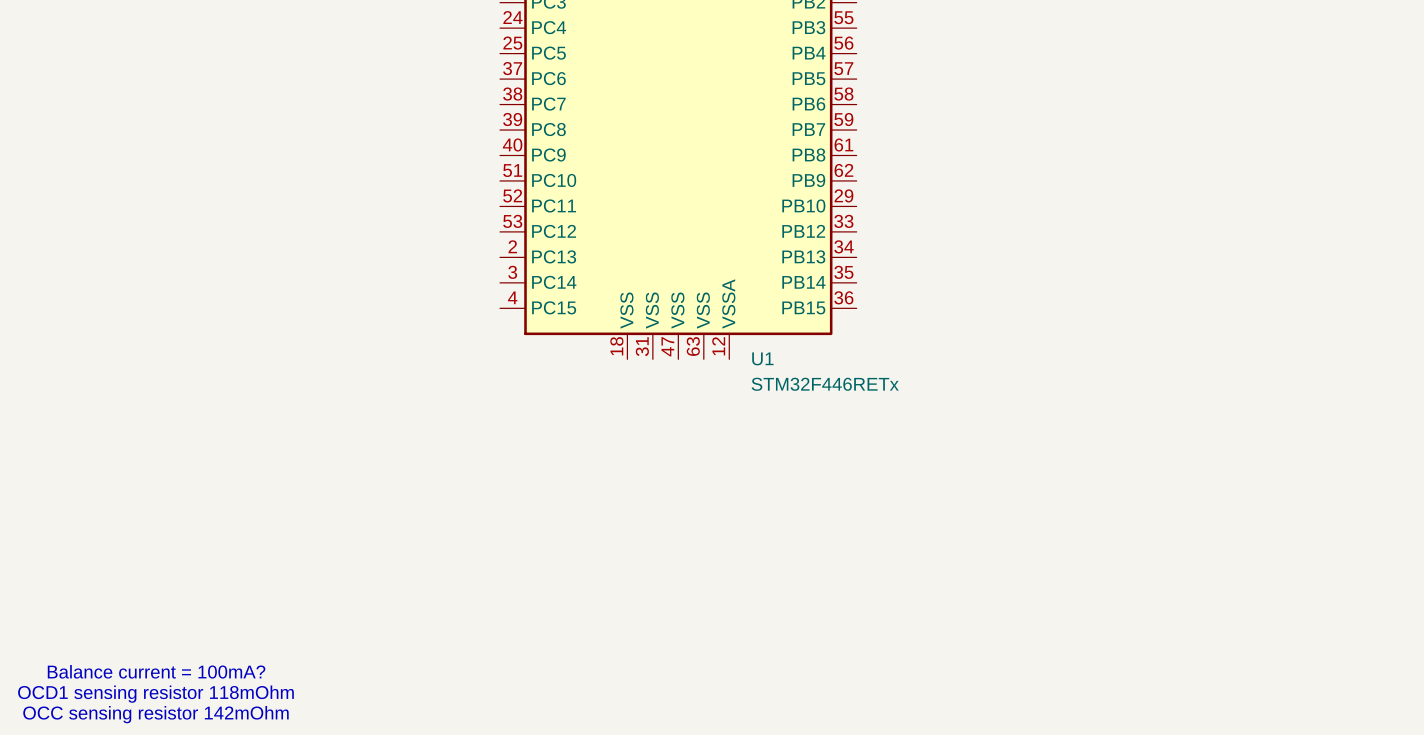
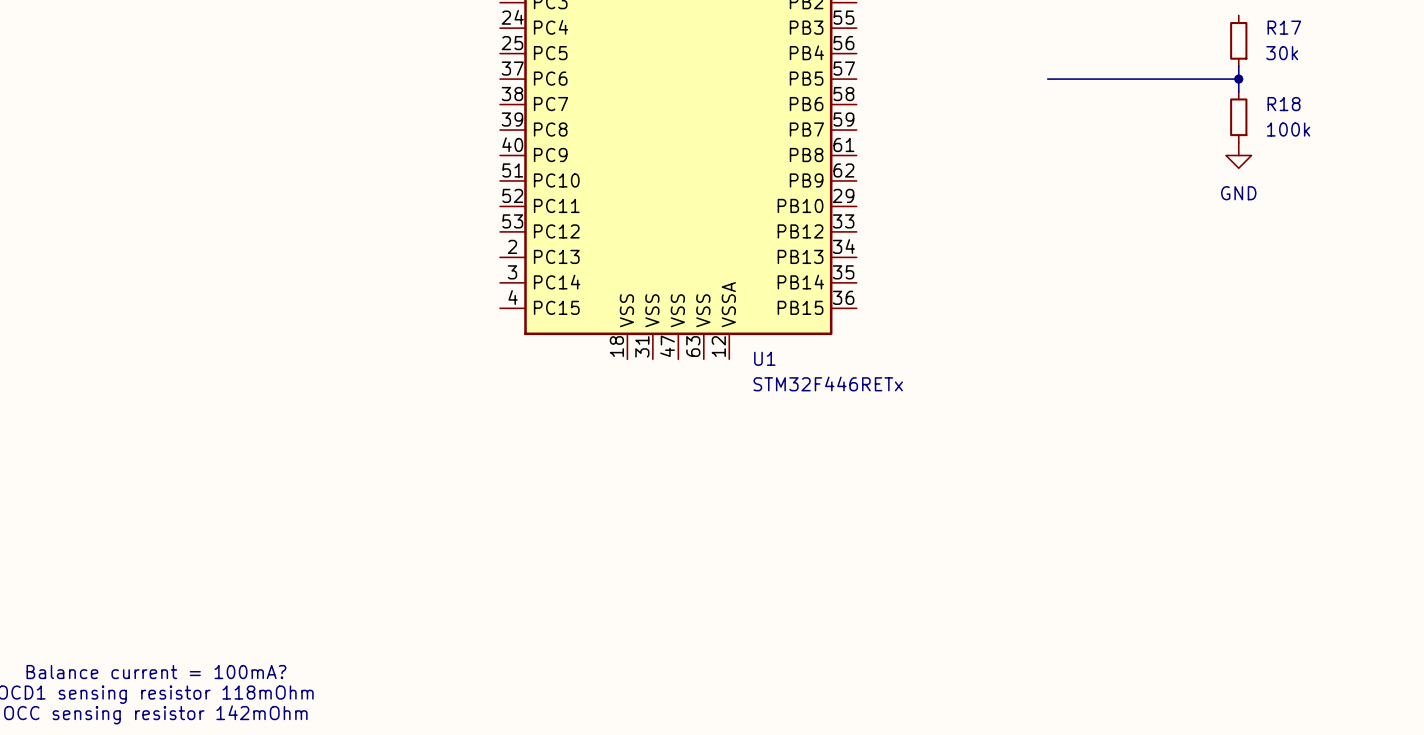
R17: none -> 30k (1238, 40)
wire: none -> (1238, 66) (1238, 91)
wire: none -> (1047, 79) (1238, 79)
junction: none -> (1238, 79)
R18: none -> 100k (1238, 117)
power symbol: none -> GND (1238, 155)

